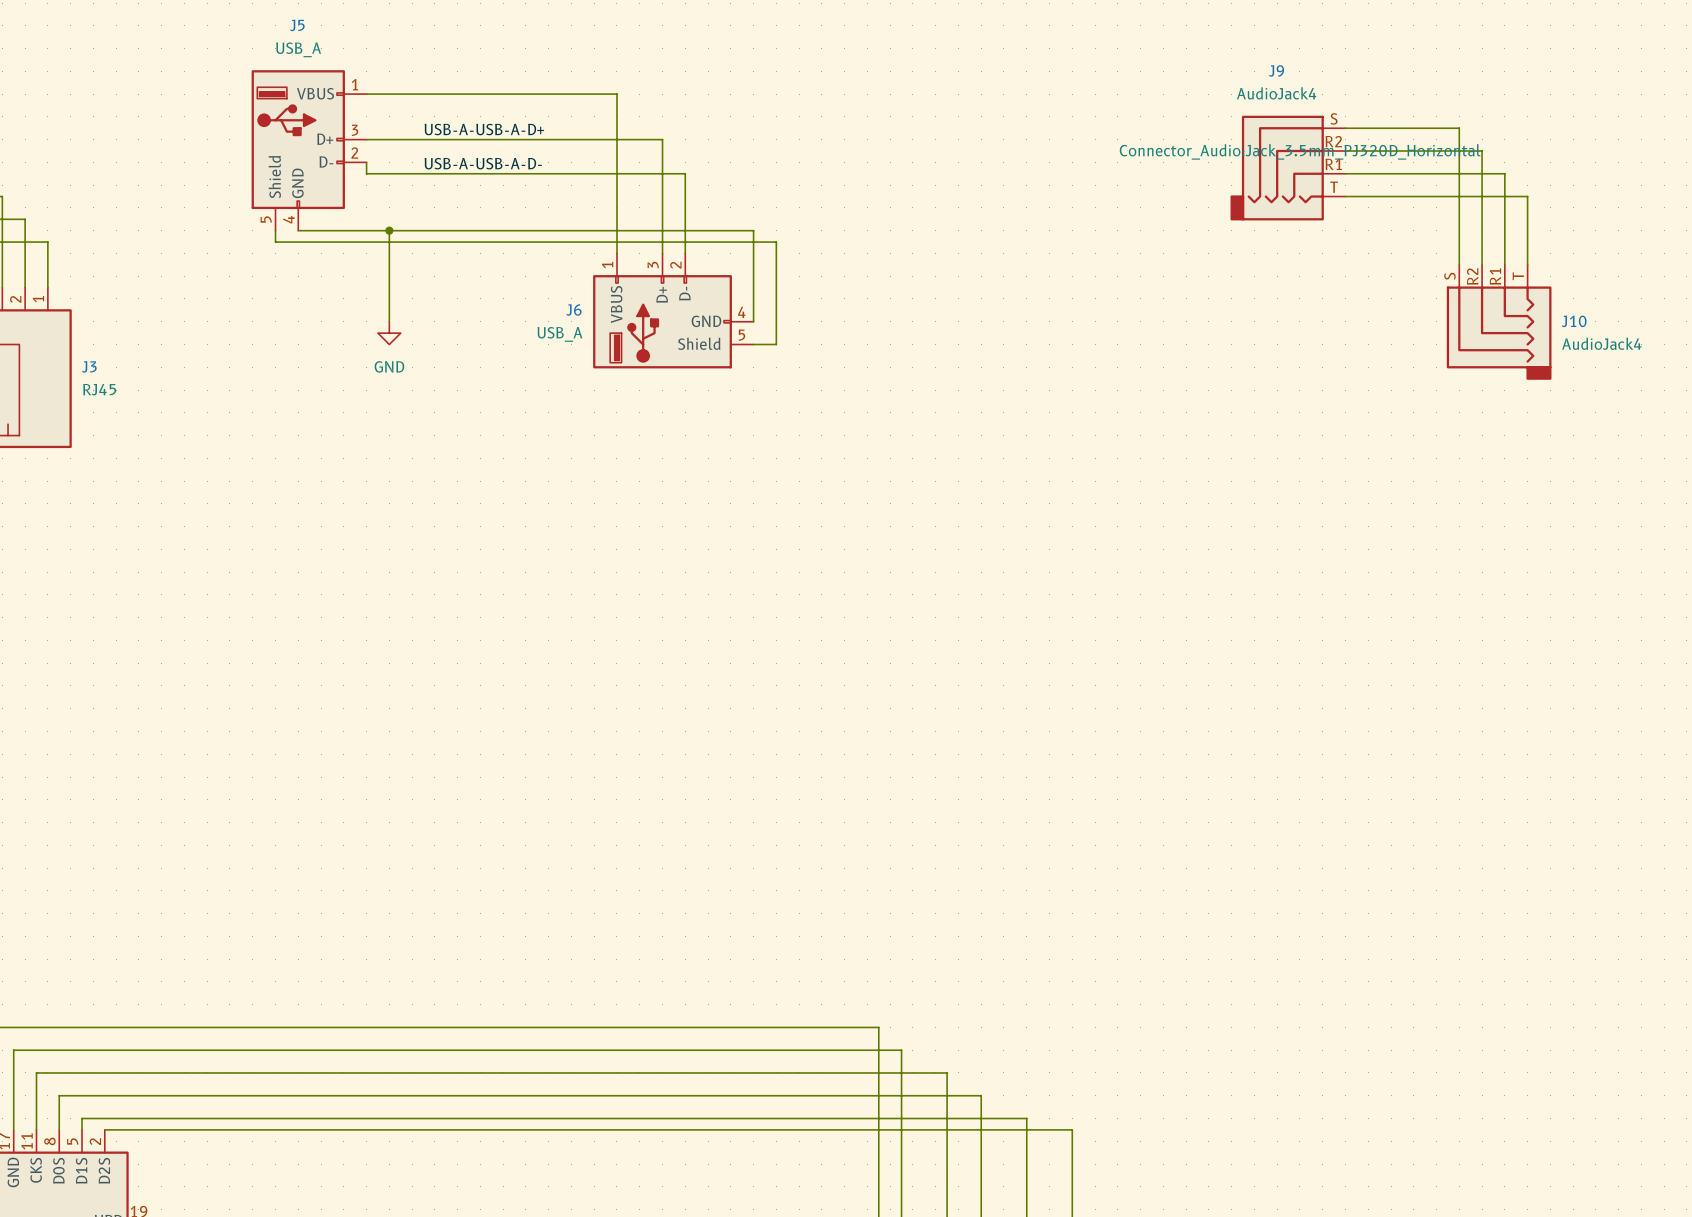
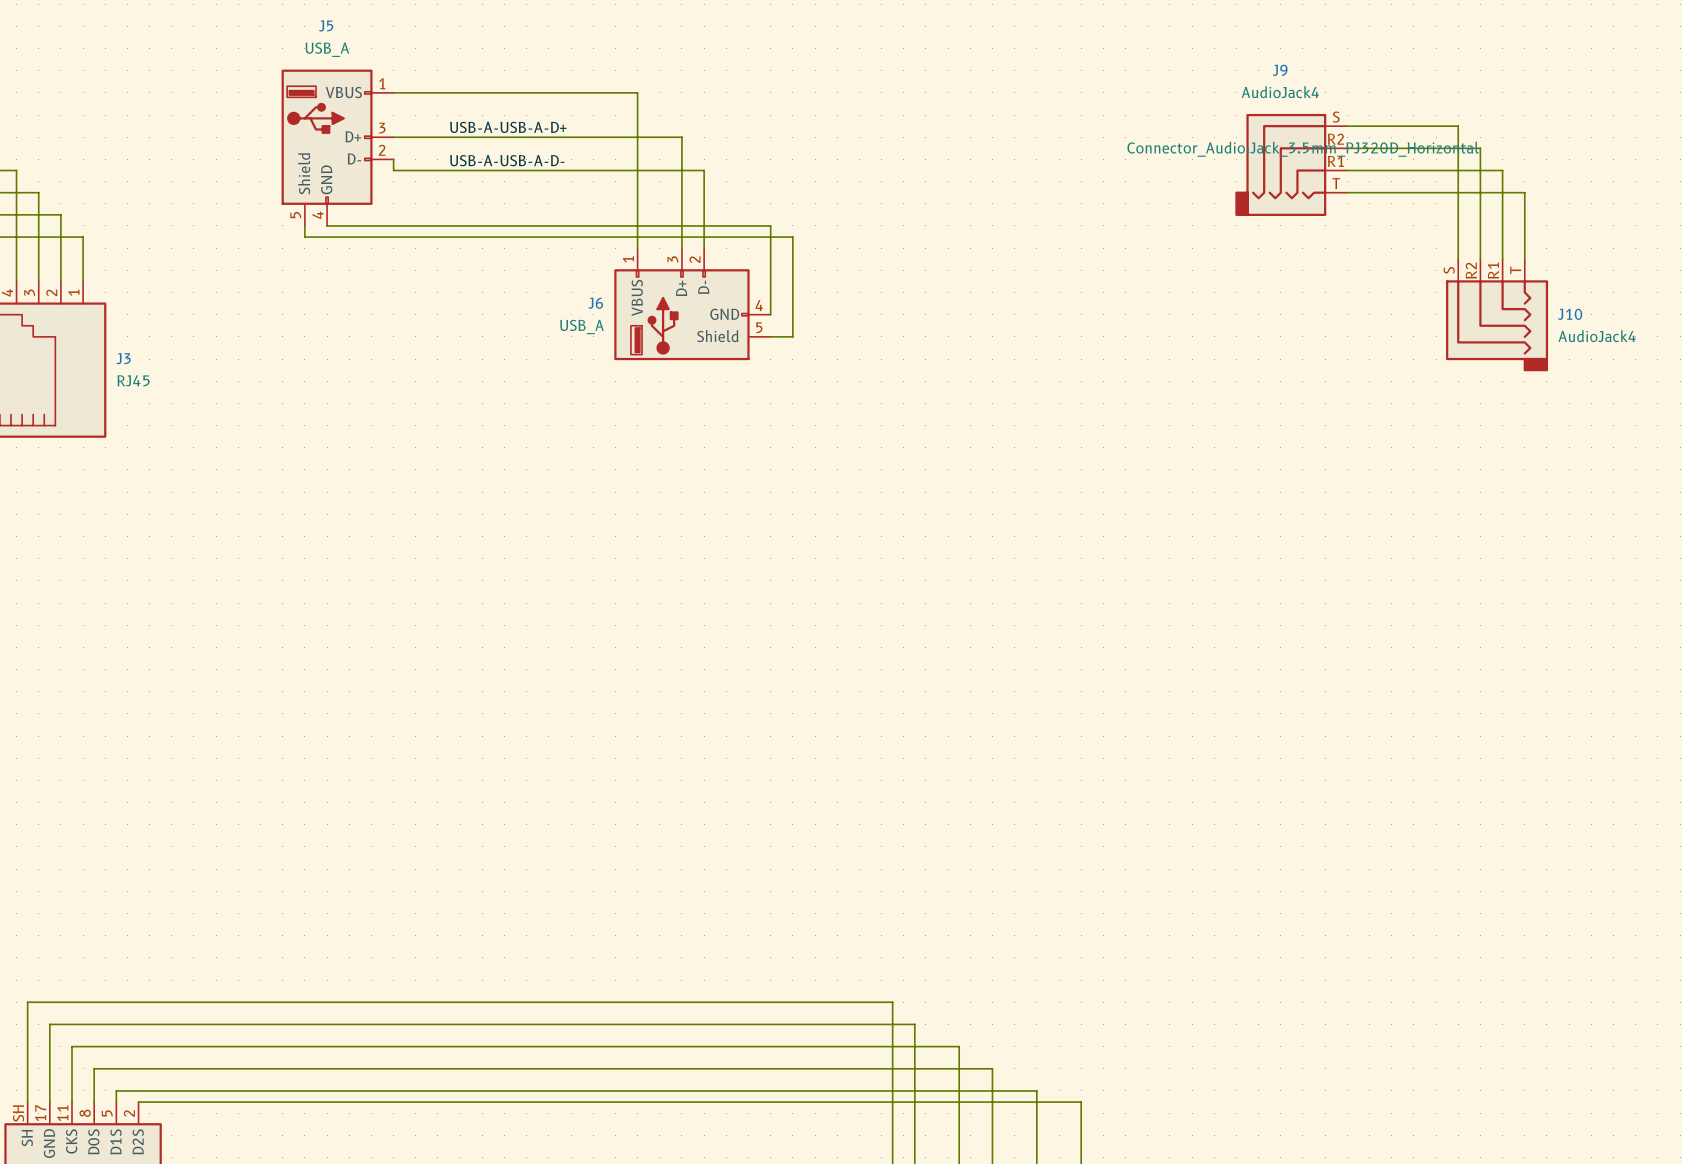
wire: (389, 230) (389, 321) -> none
junction: (389, 230) -> none
power symbol: GND (389, 333) -> none

